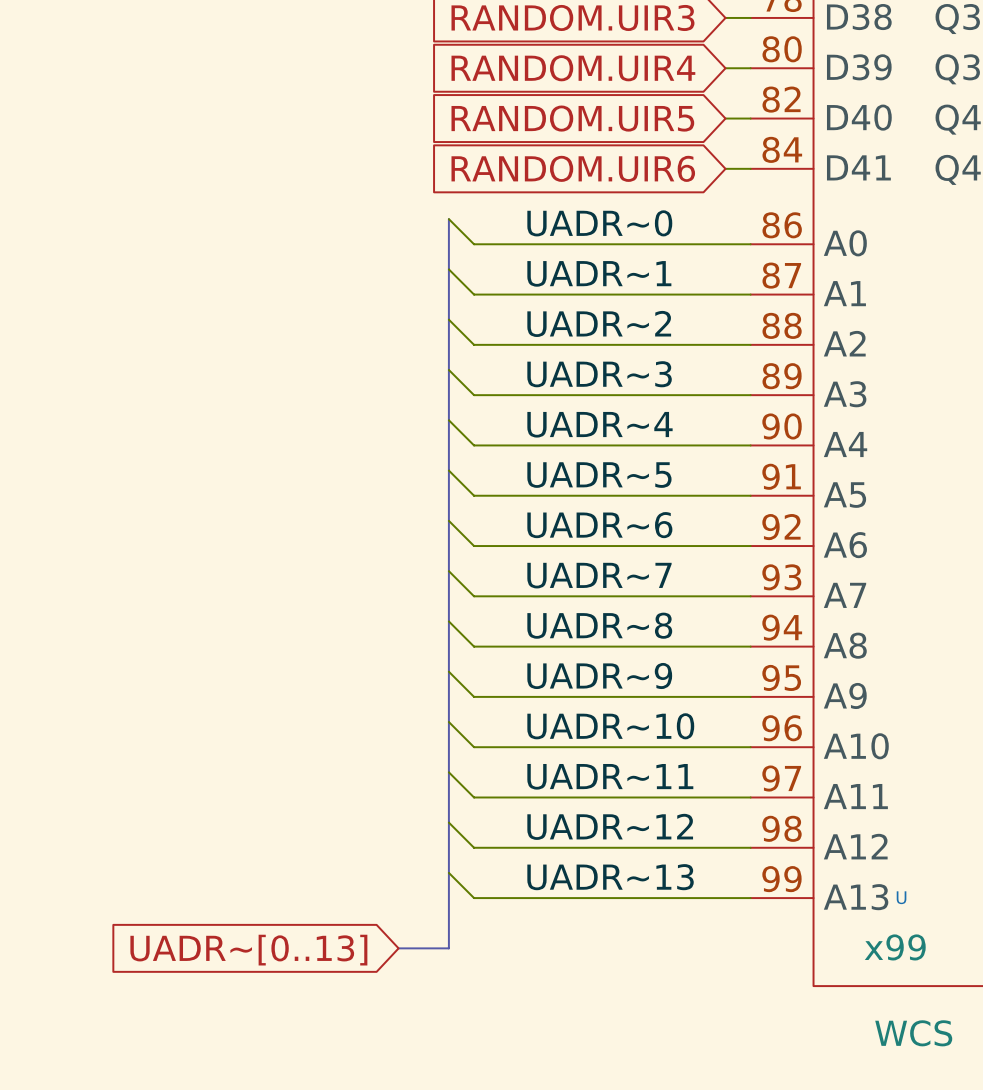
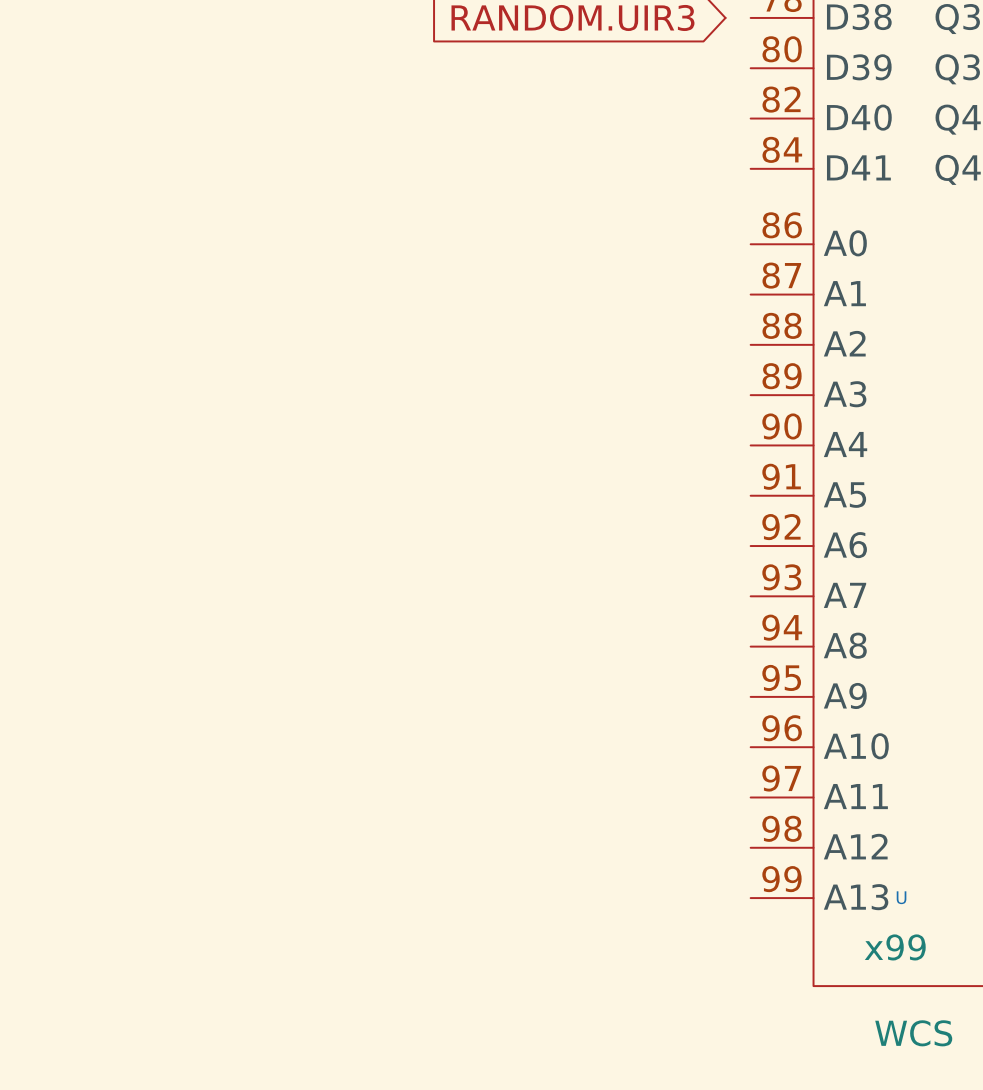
wire: (725, 17) (750, 17) -> none
global label: RANDOM.UIR4 (573, 68) -> none
wire: (725, 68) (750, 68) -> none
global label: RANDOM.UIR5 (572, 118) -> none
wire: (725, 118) (750, 118) -> none
global label: RANDOM.UIR6 (573, 168) -> none
wire: (725, 168) (750, 168) -> none
wire: (448, 219) (474, 244) (750, 244) -> none
bus: (448, 219) (448, 948) (398, 948) -> none
label: UADR~0 (599, 223) -> none
wire: (448, 269) (474, 294) (750, 294) -> none
label: UADR~1 (599, 273) -> none
wire: (448, 319) (474, 344) (750, 344) -> none
label: UADR~2 (599, 323) -> none
wire: (448, 370) (474, 395) (750, 395) -> none
label: UADR~3 (599, 374) -> none
wire: (448, 420) (474, 445) (750, 445) -> none
label: UADR~4 (599, 424) -> none
wire: (448, 470) (474, 495) (750, 495) -> none
label: UADR~5 (599, 475) -> none
wire: (448, 520) (474, 546) (750, 546) -> none
label: UADR~6 (599, 525) -> none
wire: (448, 571) (474, 596) (750, 596) -> none
label: UADR~7 (599, 575) -> none
wire: (448, 621) (474, 646) (750, 646) -> none
label: UADR~8 (599, 625) -> none
wire: (448, 671) (474, 696) (750, 696) -> none
label: UADR~9 (599, 675) -> none
wire: (448, 722) (474, 747) (750, 747) -> none
label: UADR~10 (610, 726) -> none
wire: (448, 772) (474, 797) (750, 797) -> none
label: UADR~11 (610, 776) -> none
wire: (448, 822) (474, 847) (750, 847) -> none
label: UADR~12 (610, 826) -> none
wire: (448, 872) (474, 898) (750, 898) -> none
label: UADR~13 (610, 877) -> none
global label: UADR~[0..13] (248, 950) -> none

